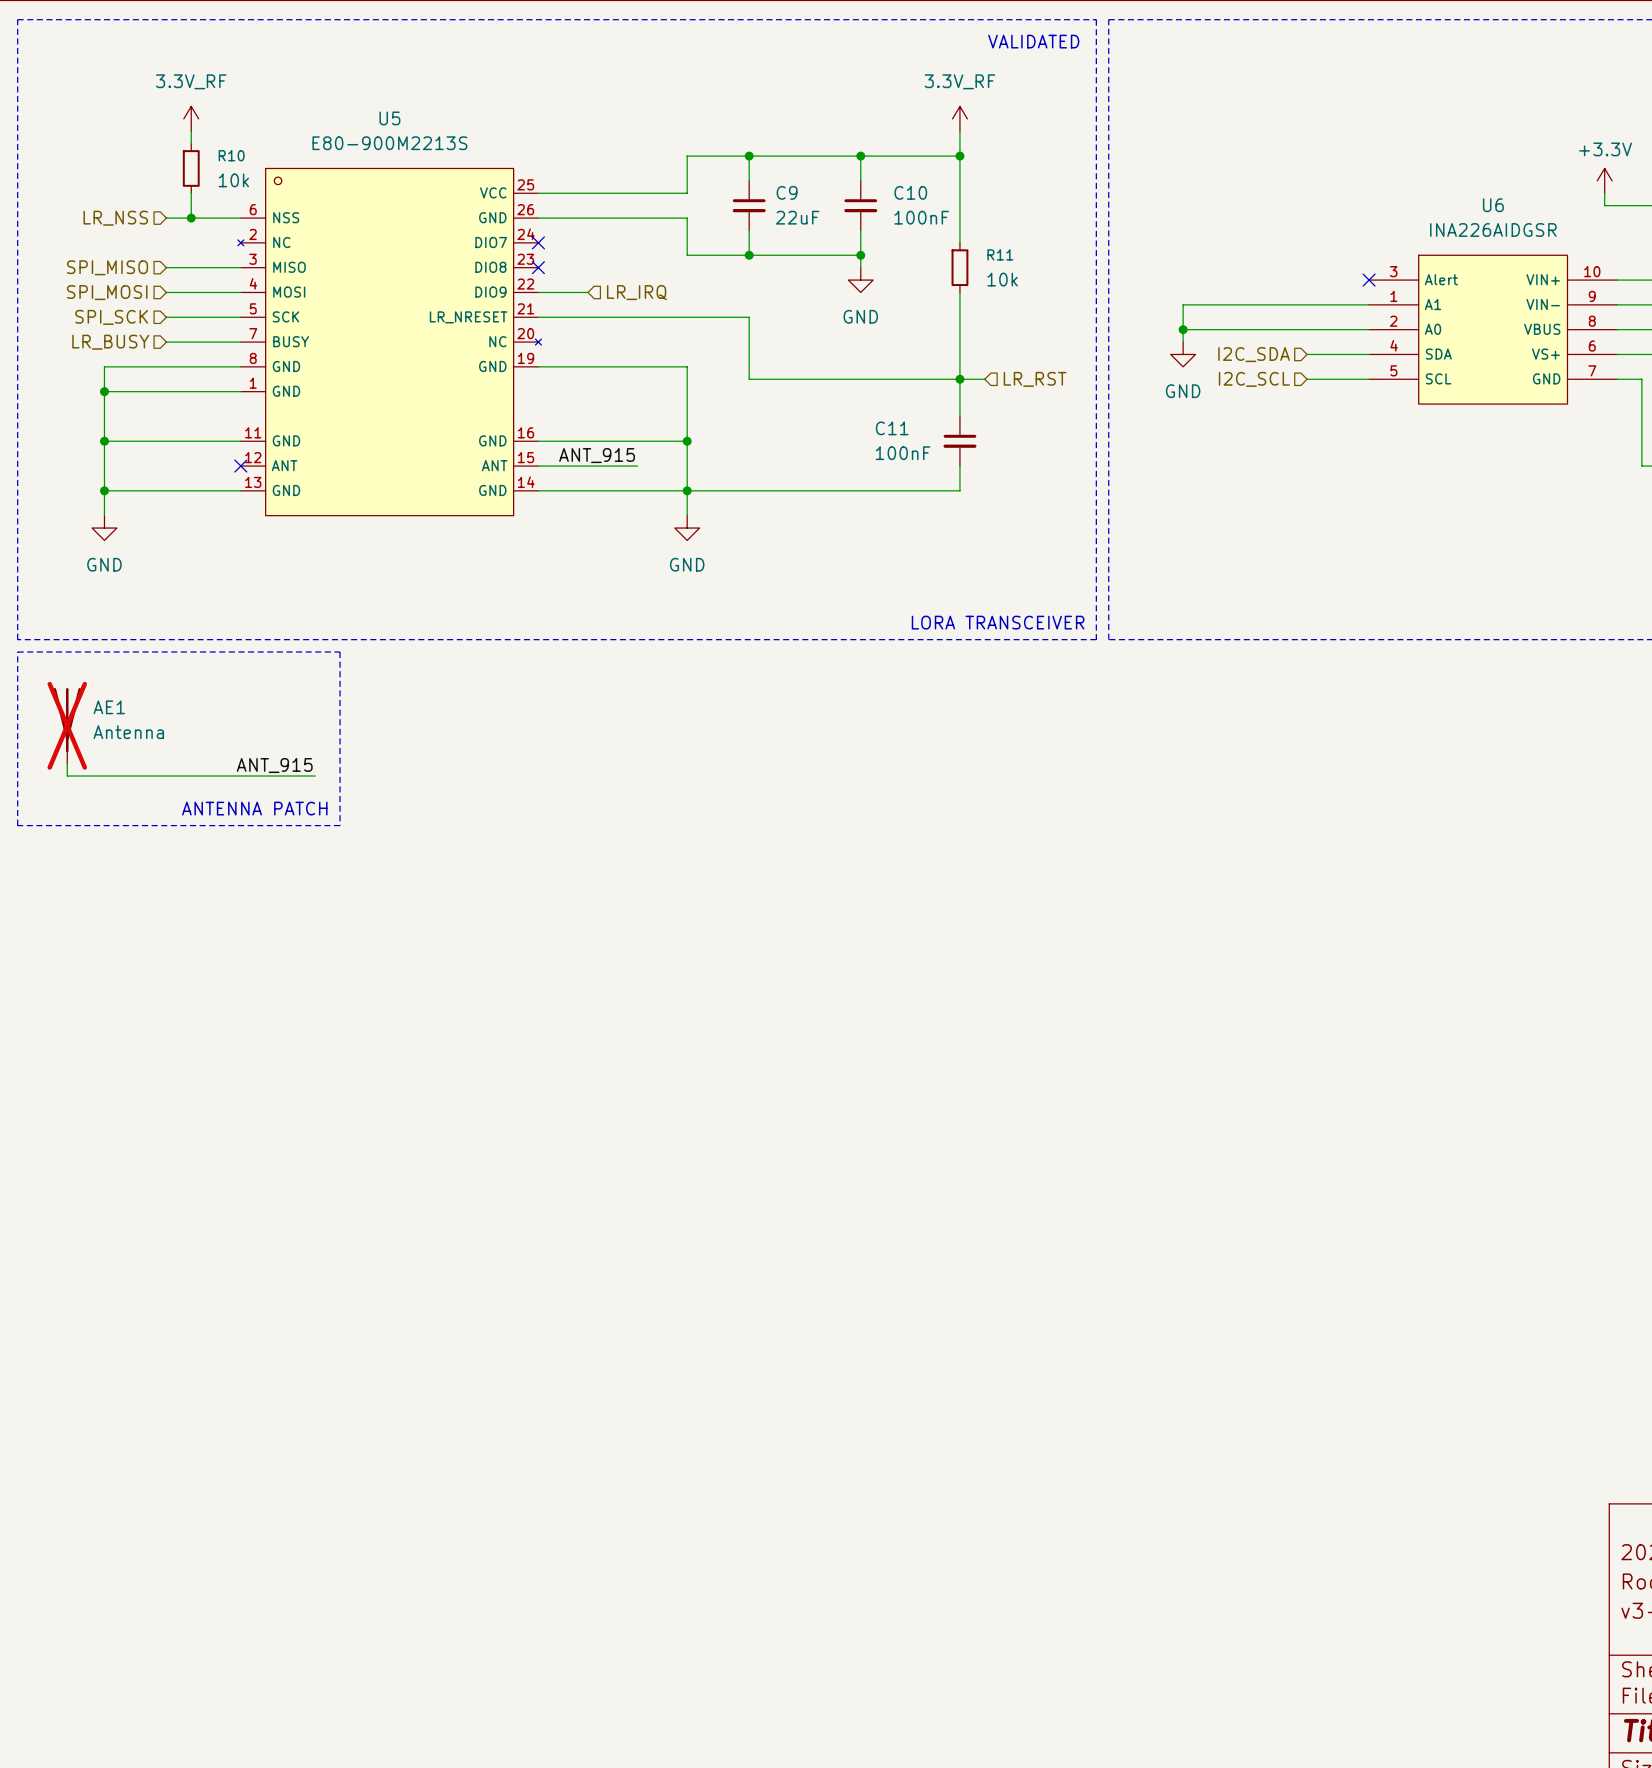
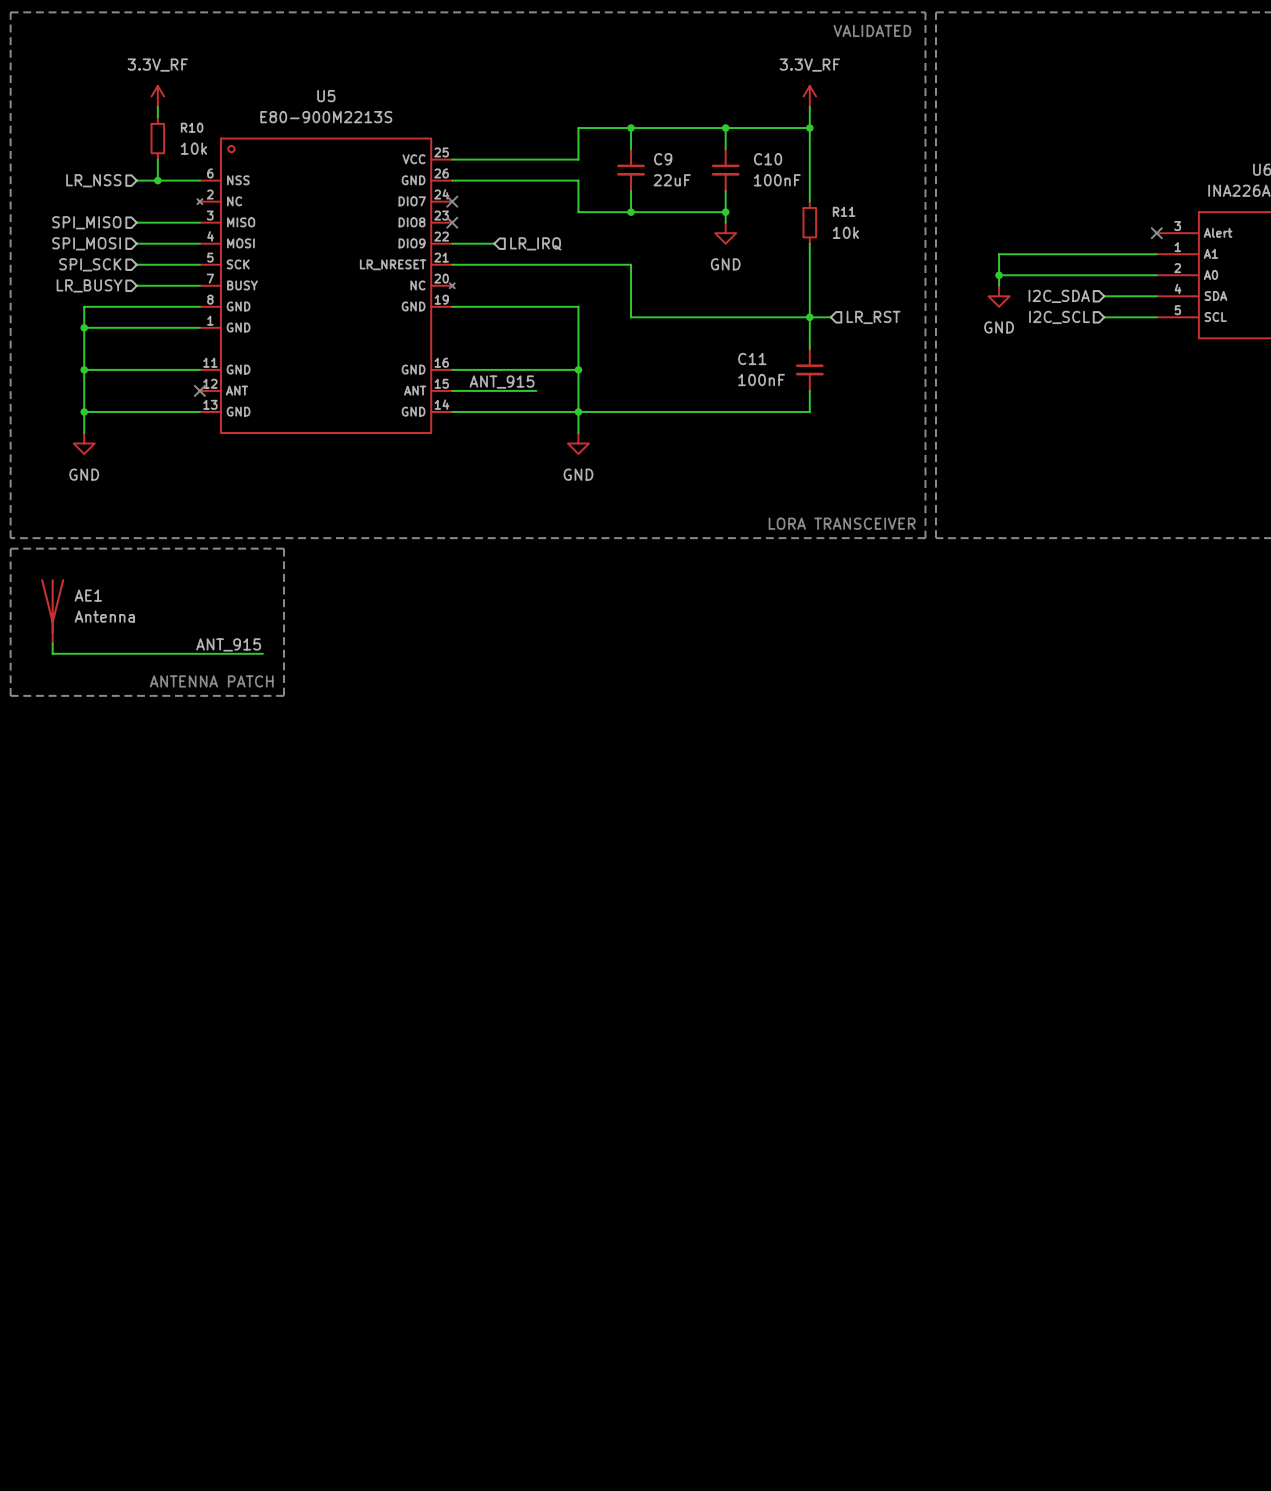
AE1 do-not-place cross: (67, 725) -> none

